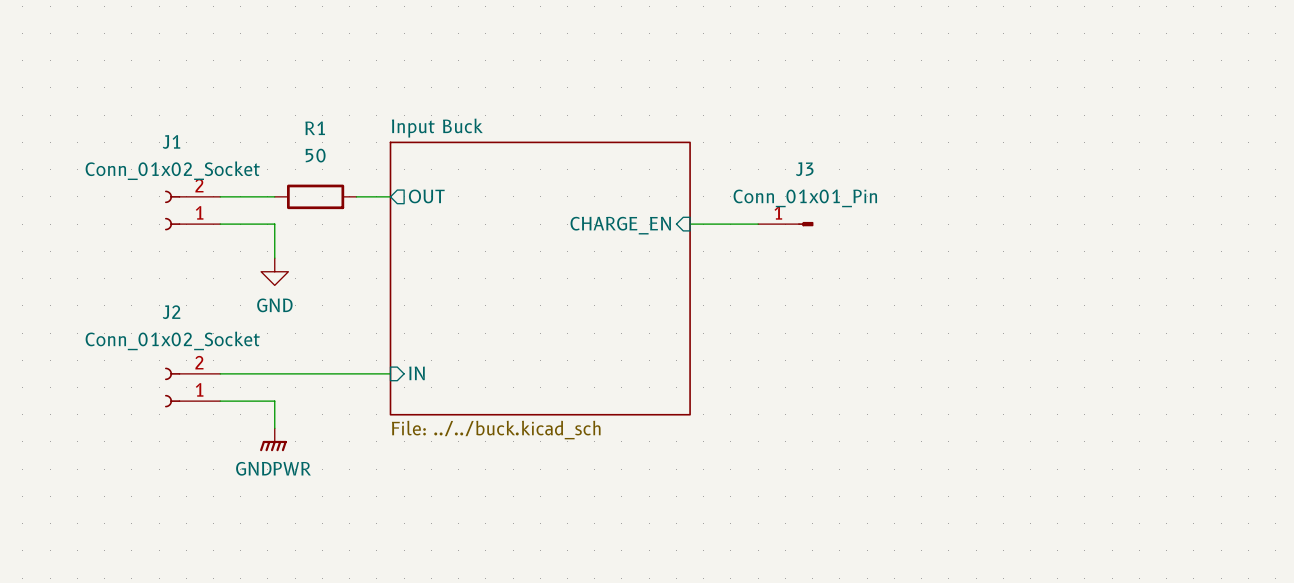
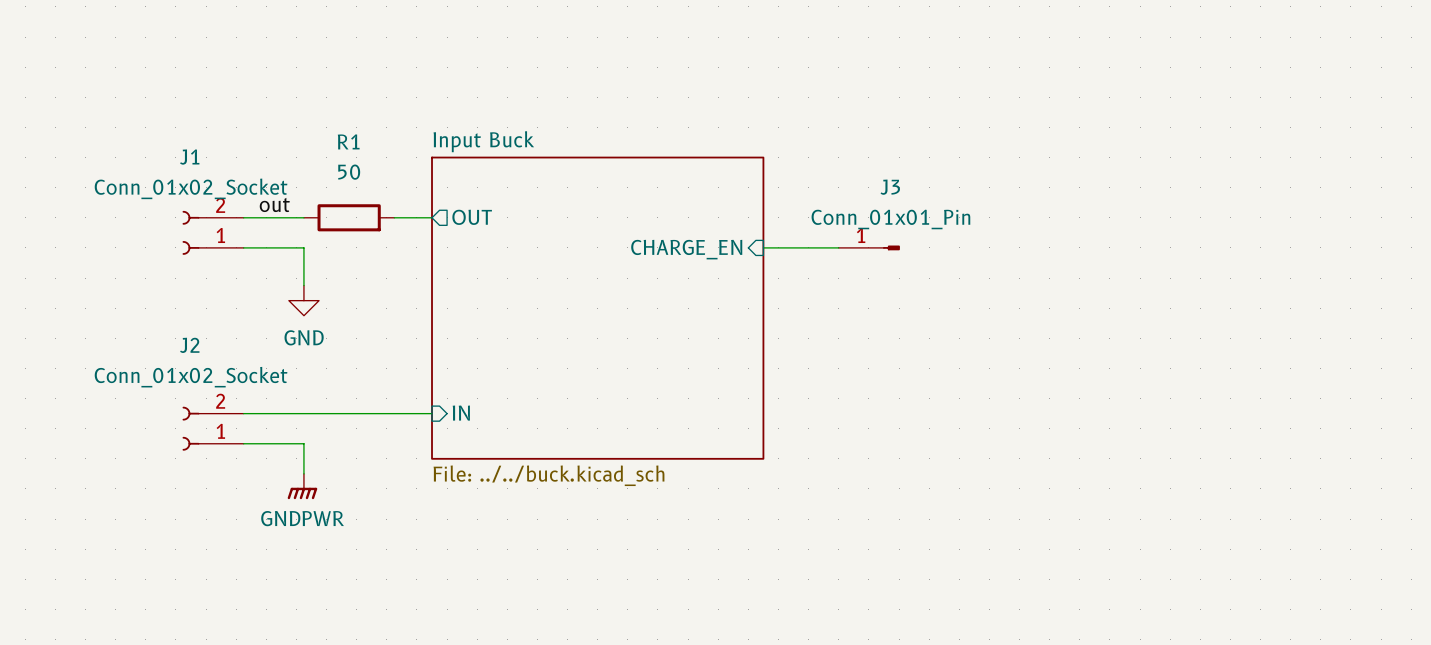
label: none -> out (274, 204)

